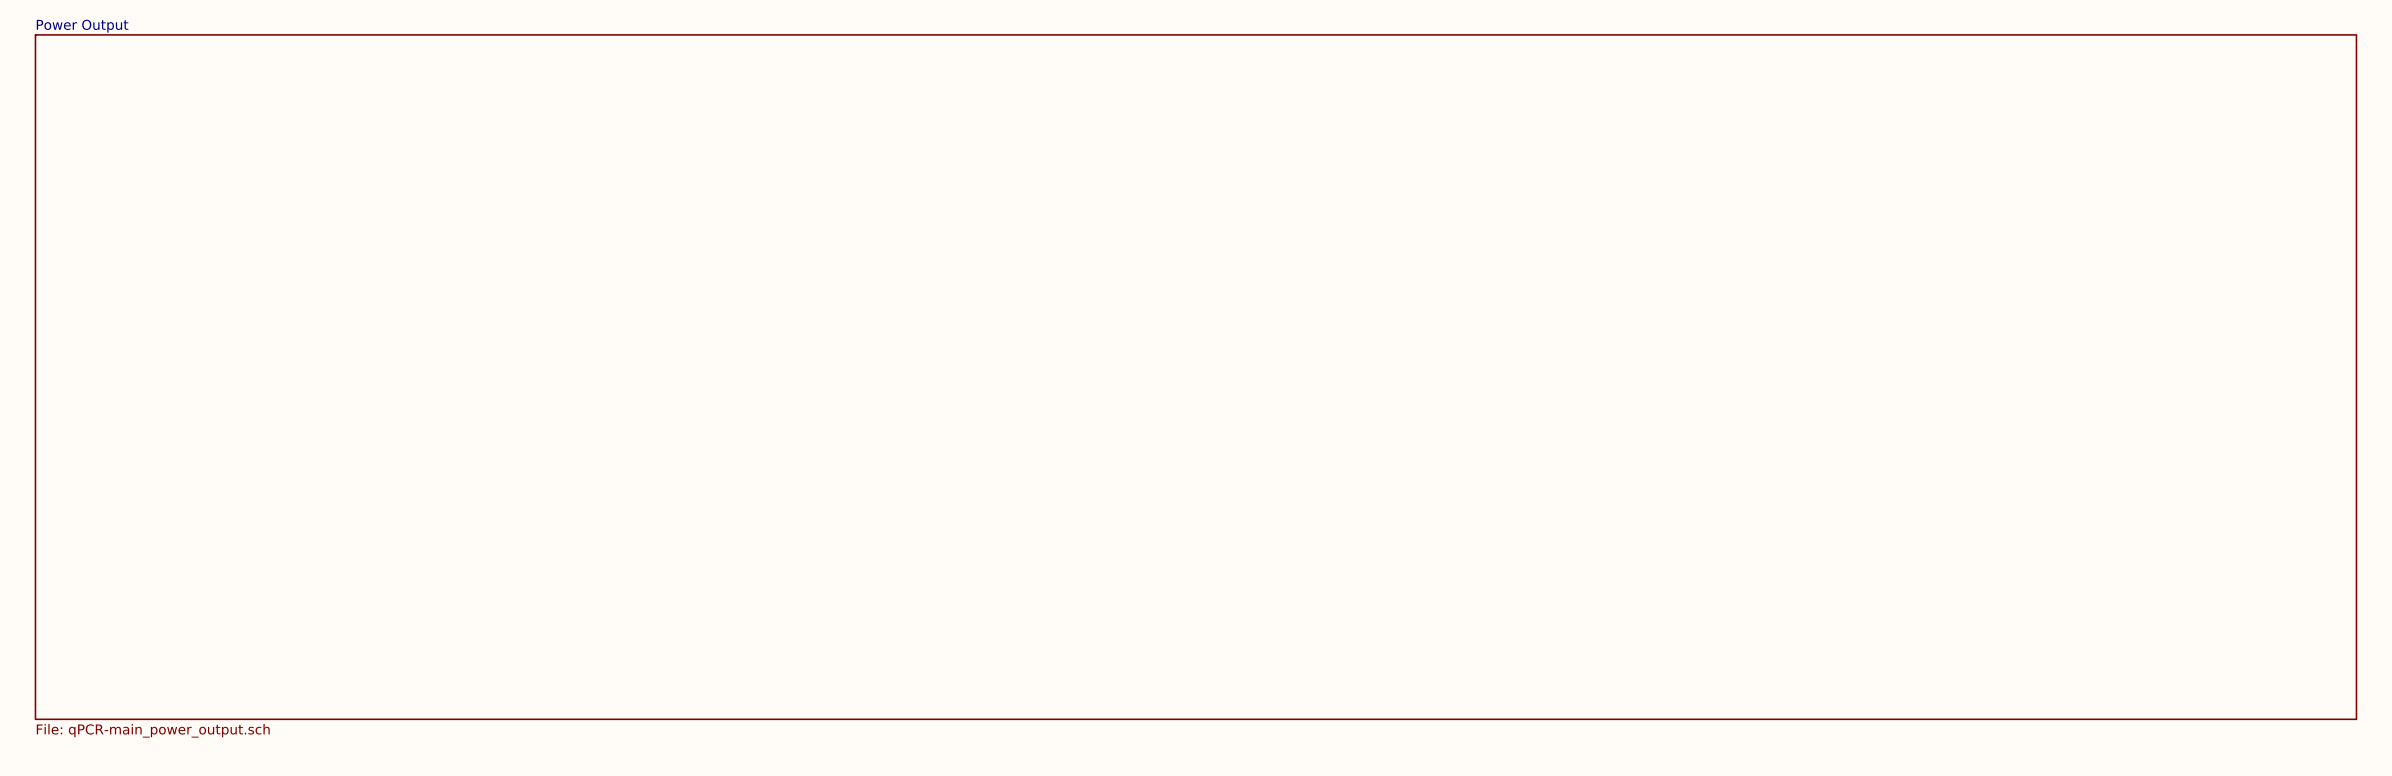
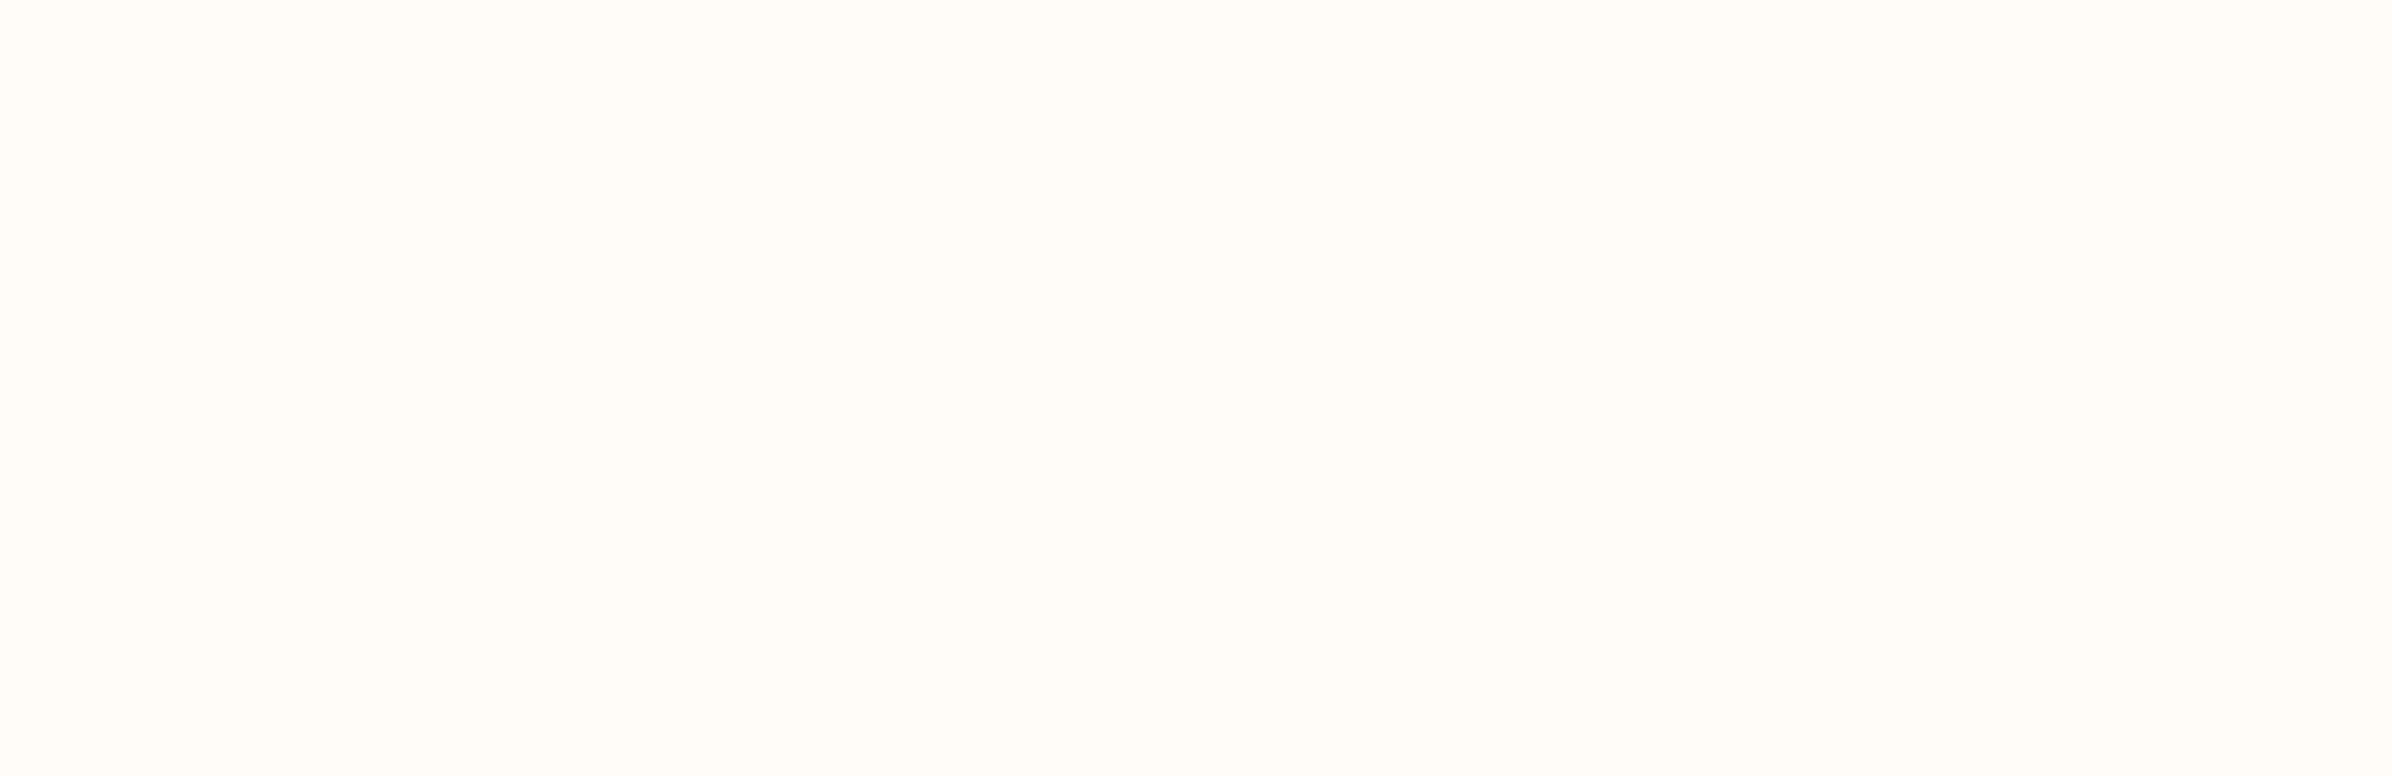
sheet Power Output: File: qPCR-main_power_output.sch (1195, 377) -> none

